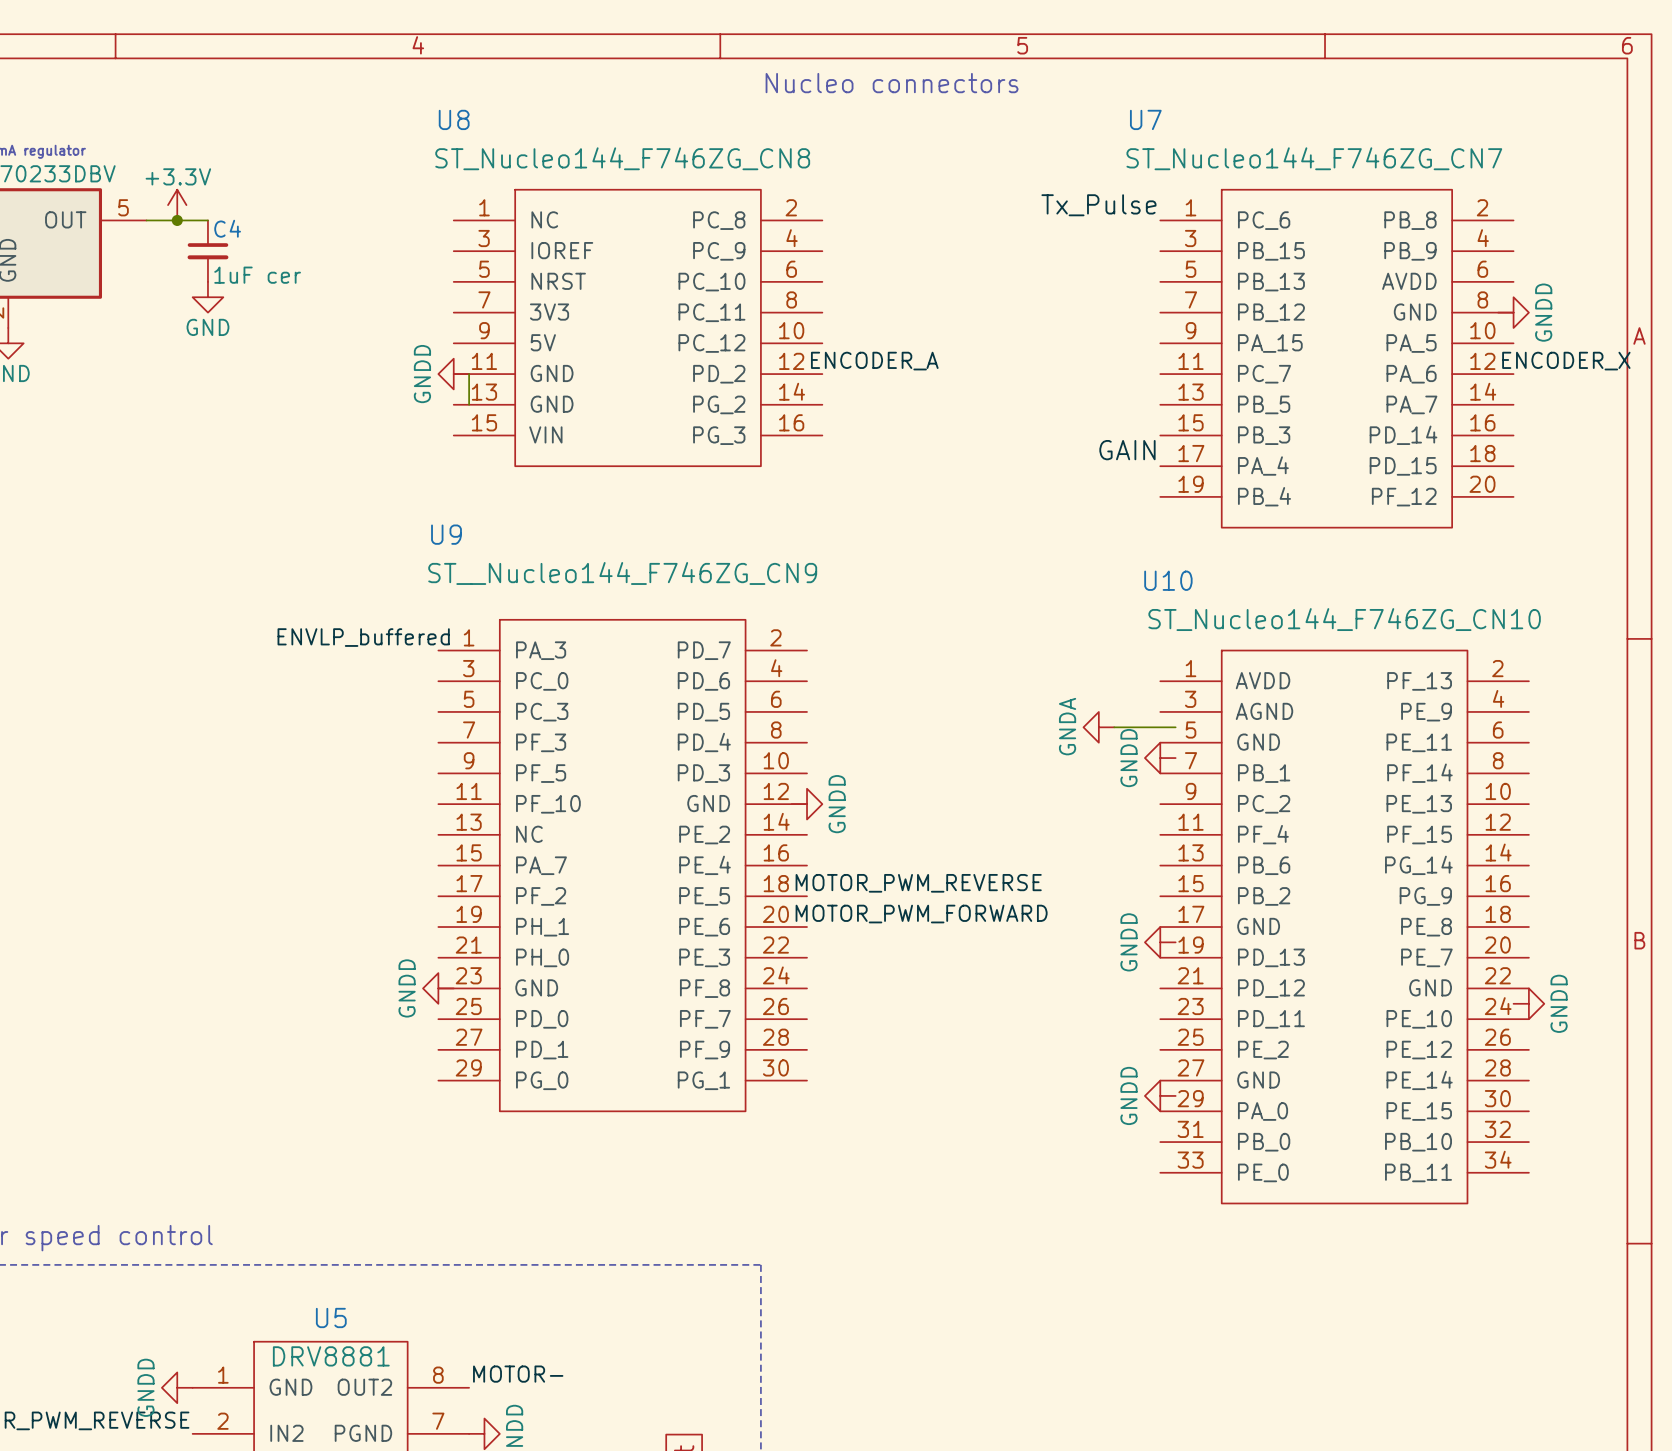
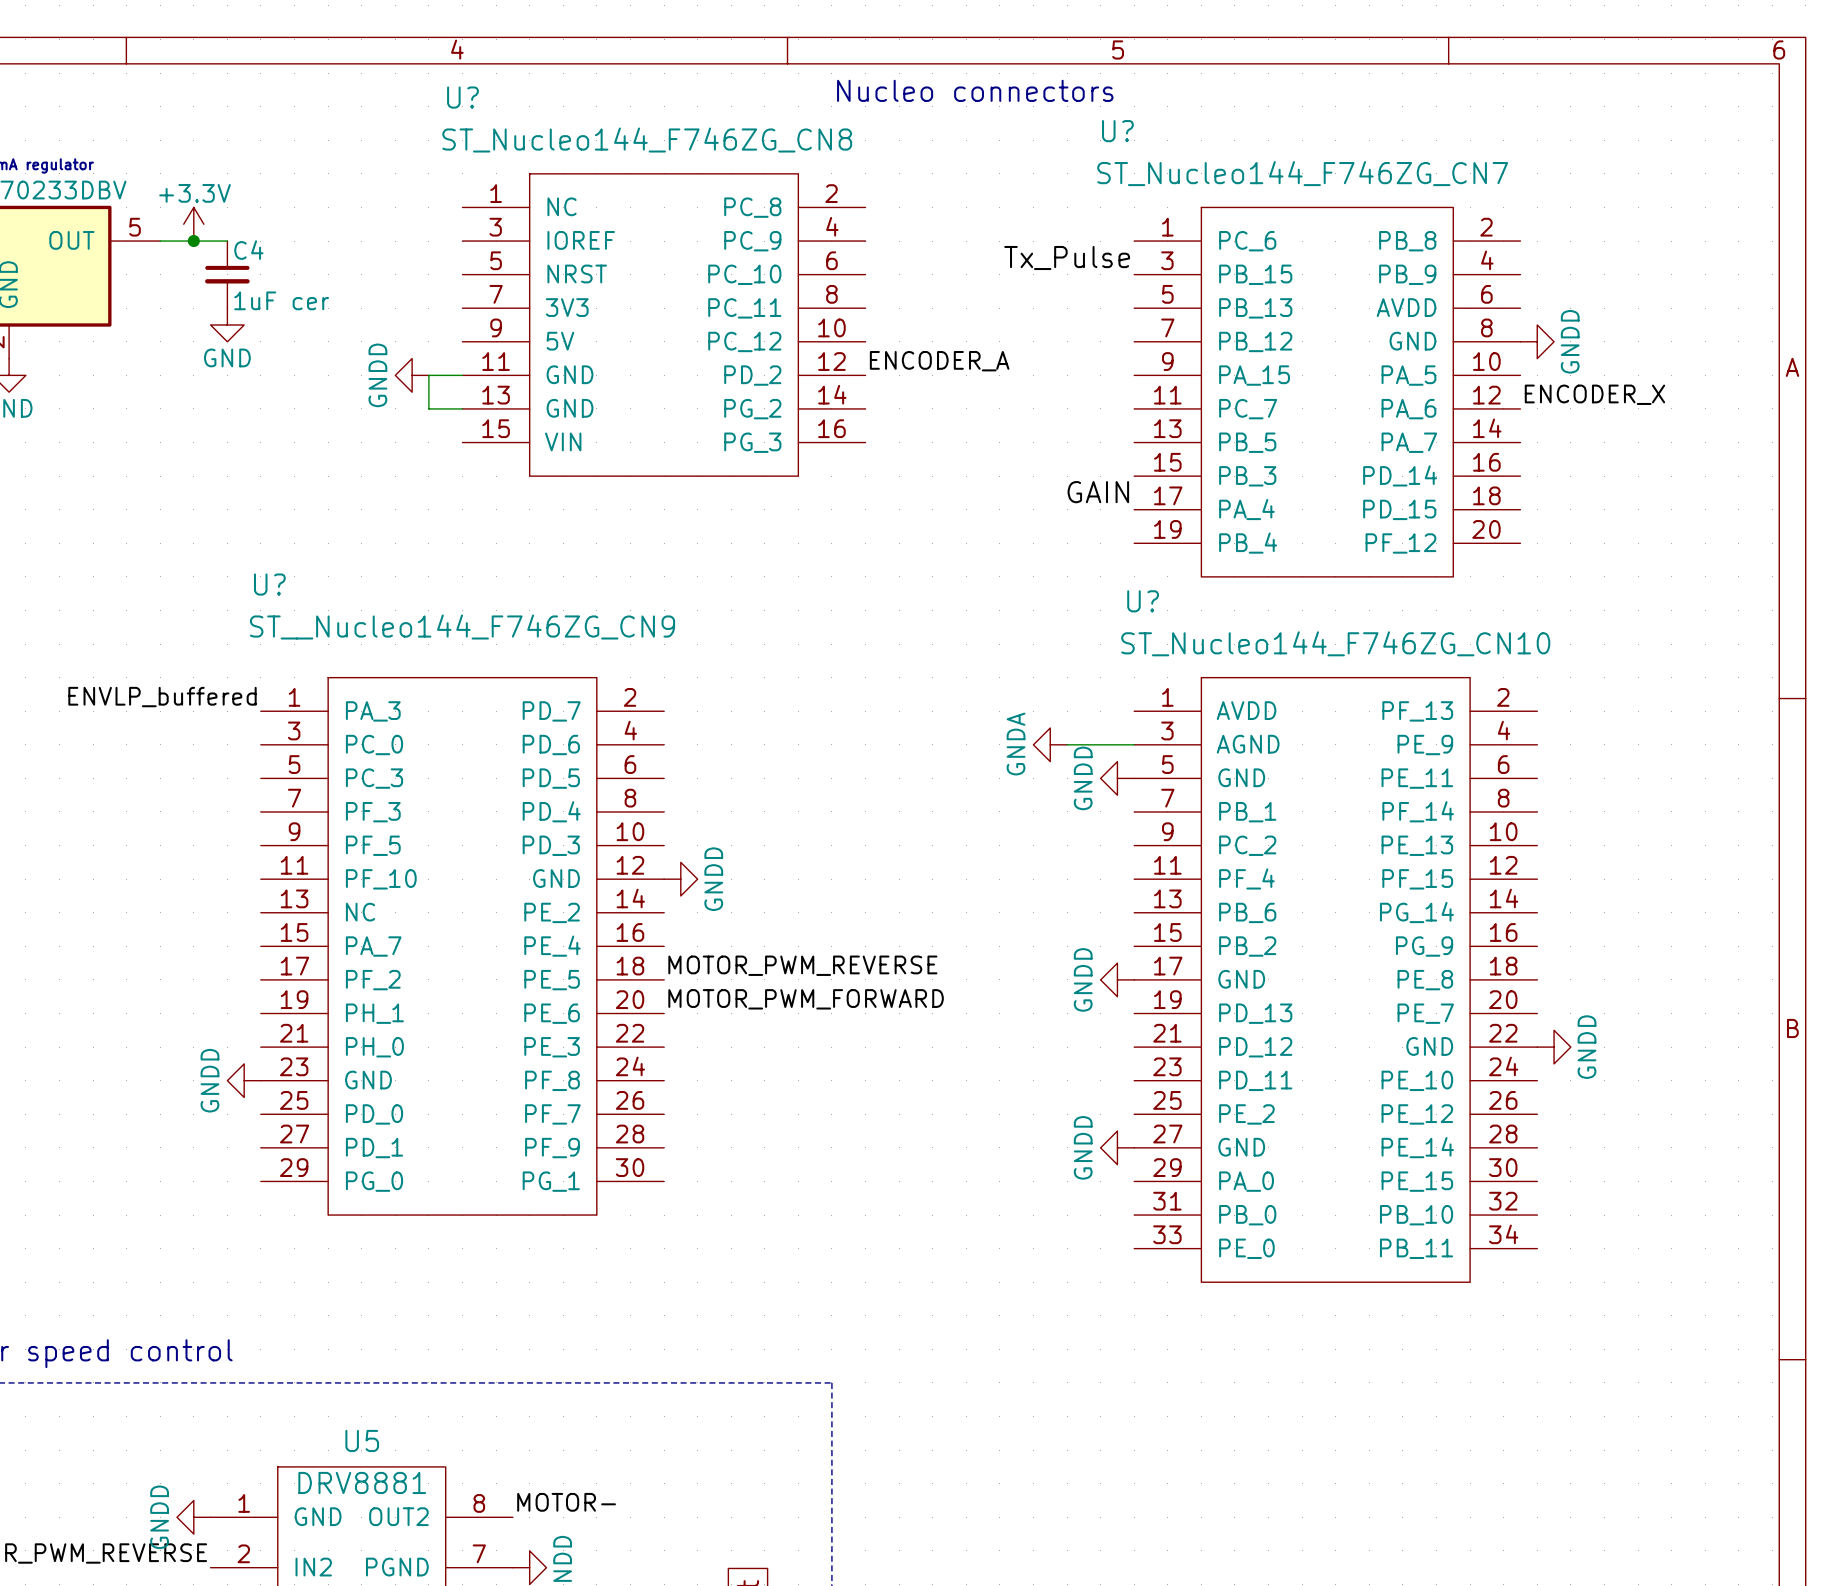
label position: Tx_Pulse (1098, 205) -> Tx_Pulse (1067, 257)
U?: none -> ST_Nucleo144_F746ZG_CN8 (664, 324)
power symbol position: GNDD (1513, 312) -> GNDD (1537, 341)
U8: ST_Nucleo144_F746ZG_CN8 (638, 327) -> none
wire: none -> (462, 375) (428, 375) (428, 408) (462, 408)
U?: none -> ST_Nucleo144_F746ZG_CN7 (1327, 392)
U7: ST_Nucleo144_F746ZG_CN7 (1336, 358) -> none
label position: ENCODER_A (874, 361) -> ENCODER_A (939, 361)
label position: ENCODER_X (1566, 361) -> ENCODER_X (1594, 394)
power symbol position: GNDD (453, 374) -> GNDD (412, 375)
wire: (469, 374) (469, 404) -> none
label position: GAIN (1127, 450) -> GAIN (1098, 492)
label position: ENVLP_buffered (363, 637) -> ENVLP_buffered (162, 697)
power symbol: none -> GNDD (1117, 778)
power symbol position: GNDA (1098, 727) -> GNDA (1050, 744)
wire: (1114, 727) (1175, 727) -> (1067, 744) (1134, 744)
power symbol: GNDD (1160, 758) -> none
power symbol: none -> GNDD (680, 879)
power symbol: GNDD (807, 804) -> none
U?: none -> ST__Nucleo144_F746ZG_CN9 (462, 946)
U9: ST__Nucleo144_F746ZG_CN9 (622, 865) -> none
label position: MOTOR_PWM_REVERSE (918, 883) -> MOTOR_PWM_REVERSE (802, 965)
power symbol: none -> GNDD (1117, 979)
U?: none -> ST_Nucleo144_F746ZG_CN10 (1335, 979)
label position: MOTOR_PWM_FORWARD (921, 914) -> MOTOR_PWM_FORWARD (806, 999)
U10: ST_Nucleo144_F746ZG_CN10 (1344, 927) -> none
power symbol: GNDD (1160, 942) -> none
power symbol: none -> GNDD (244, 1080)
power symbol: GNDD (438, 988) -> none
power symbol position: GNDD (1528, 1003) -> GNDD (1554, 1047)
power symbol: none -> GNDD (1117, 1147)
power symbol: GNDD (1160, 1095) -> none

